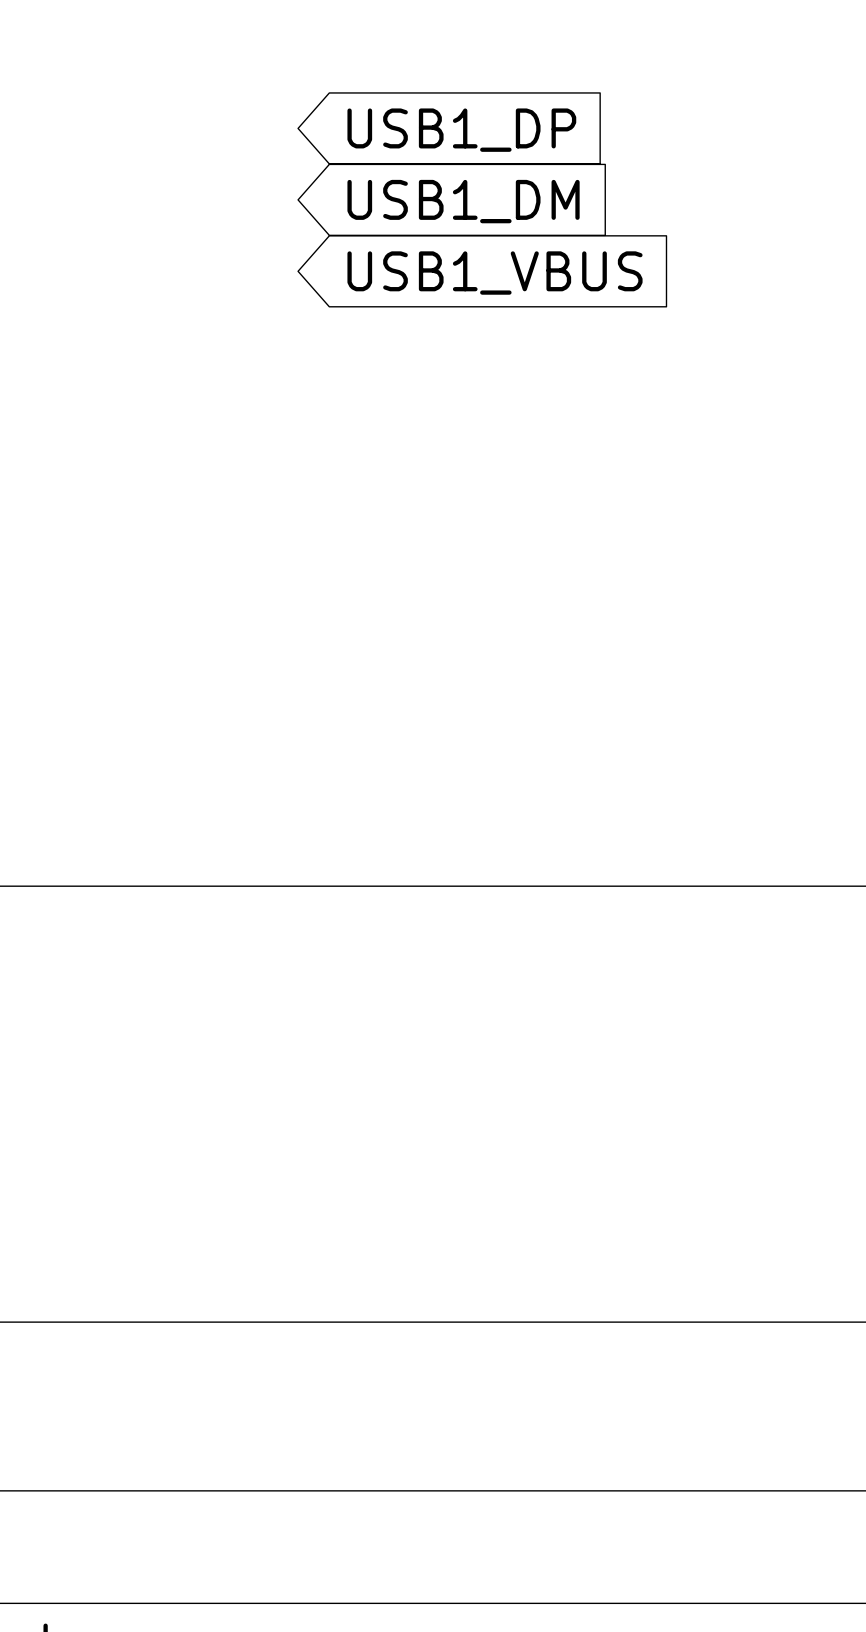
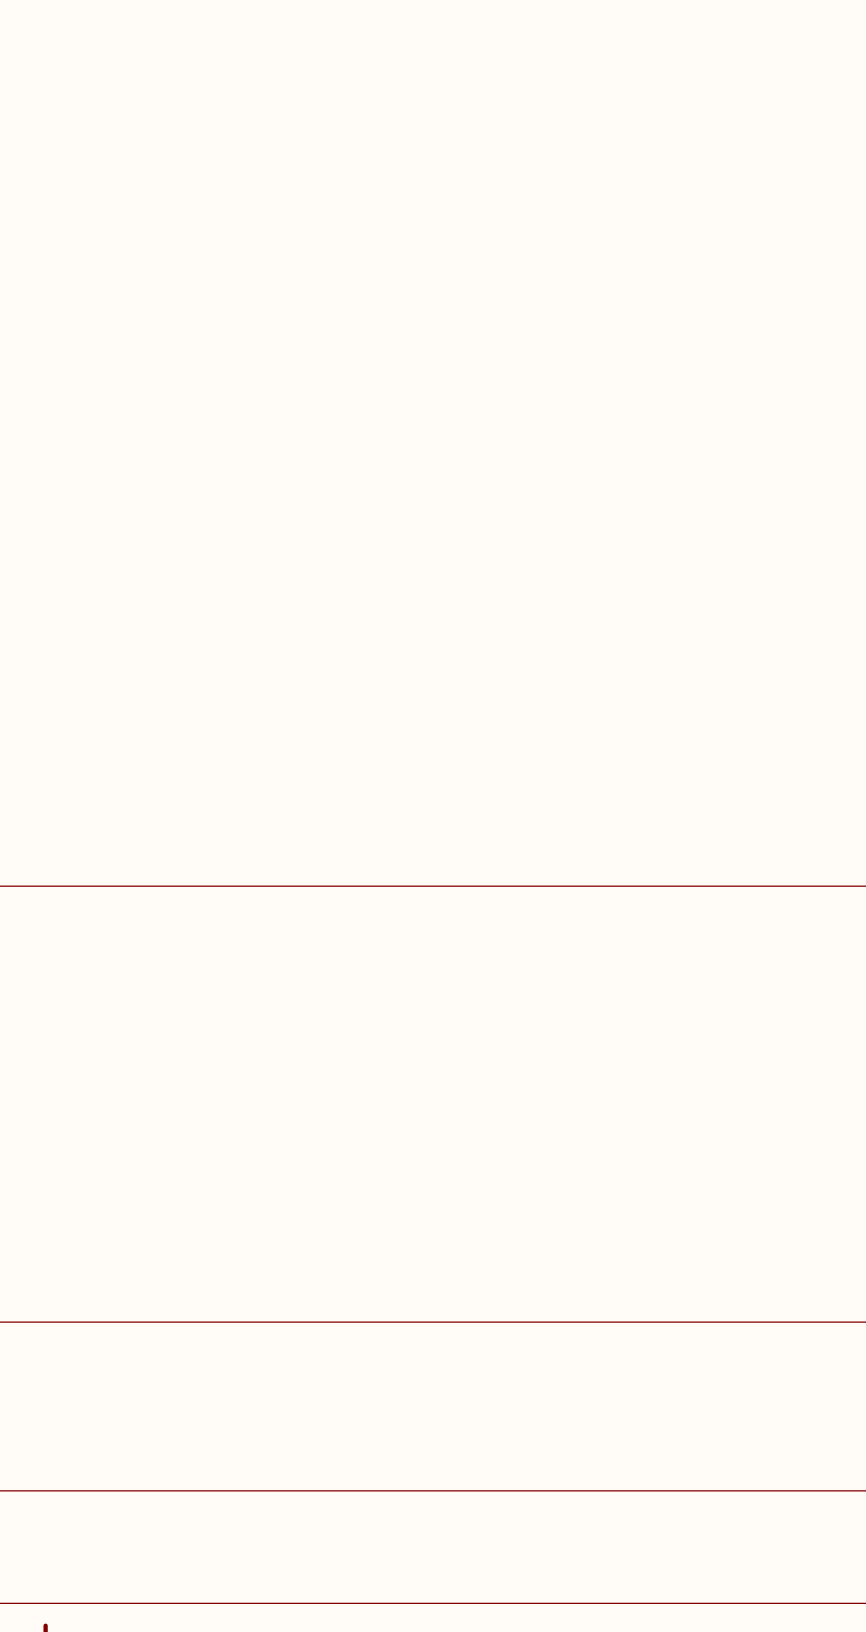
global label: USB1_DP (461, 130) -> none
global label: USB1_DM (463, 201) -> none
global label: USB1_VBUS (495, 273) -> none

